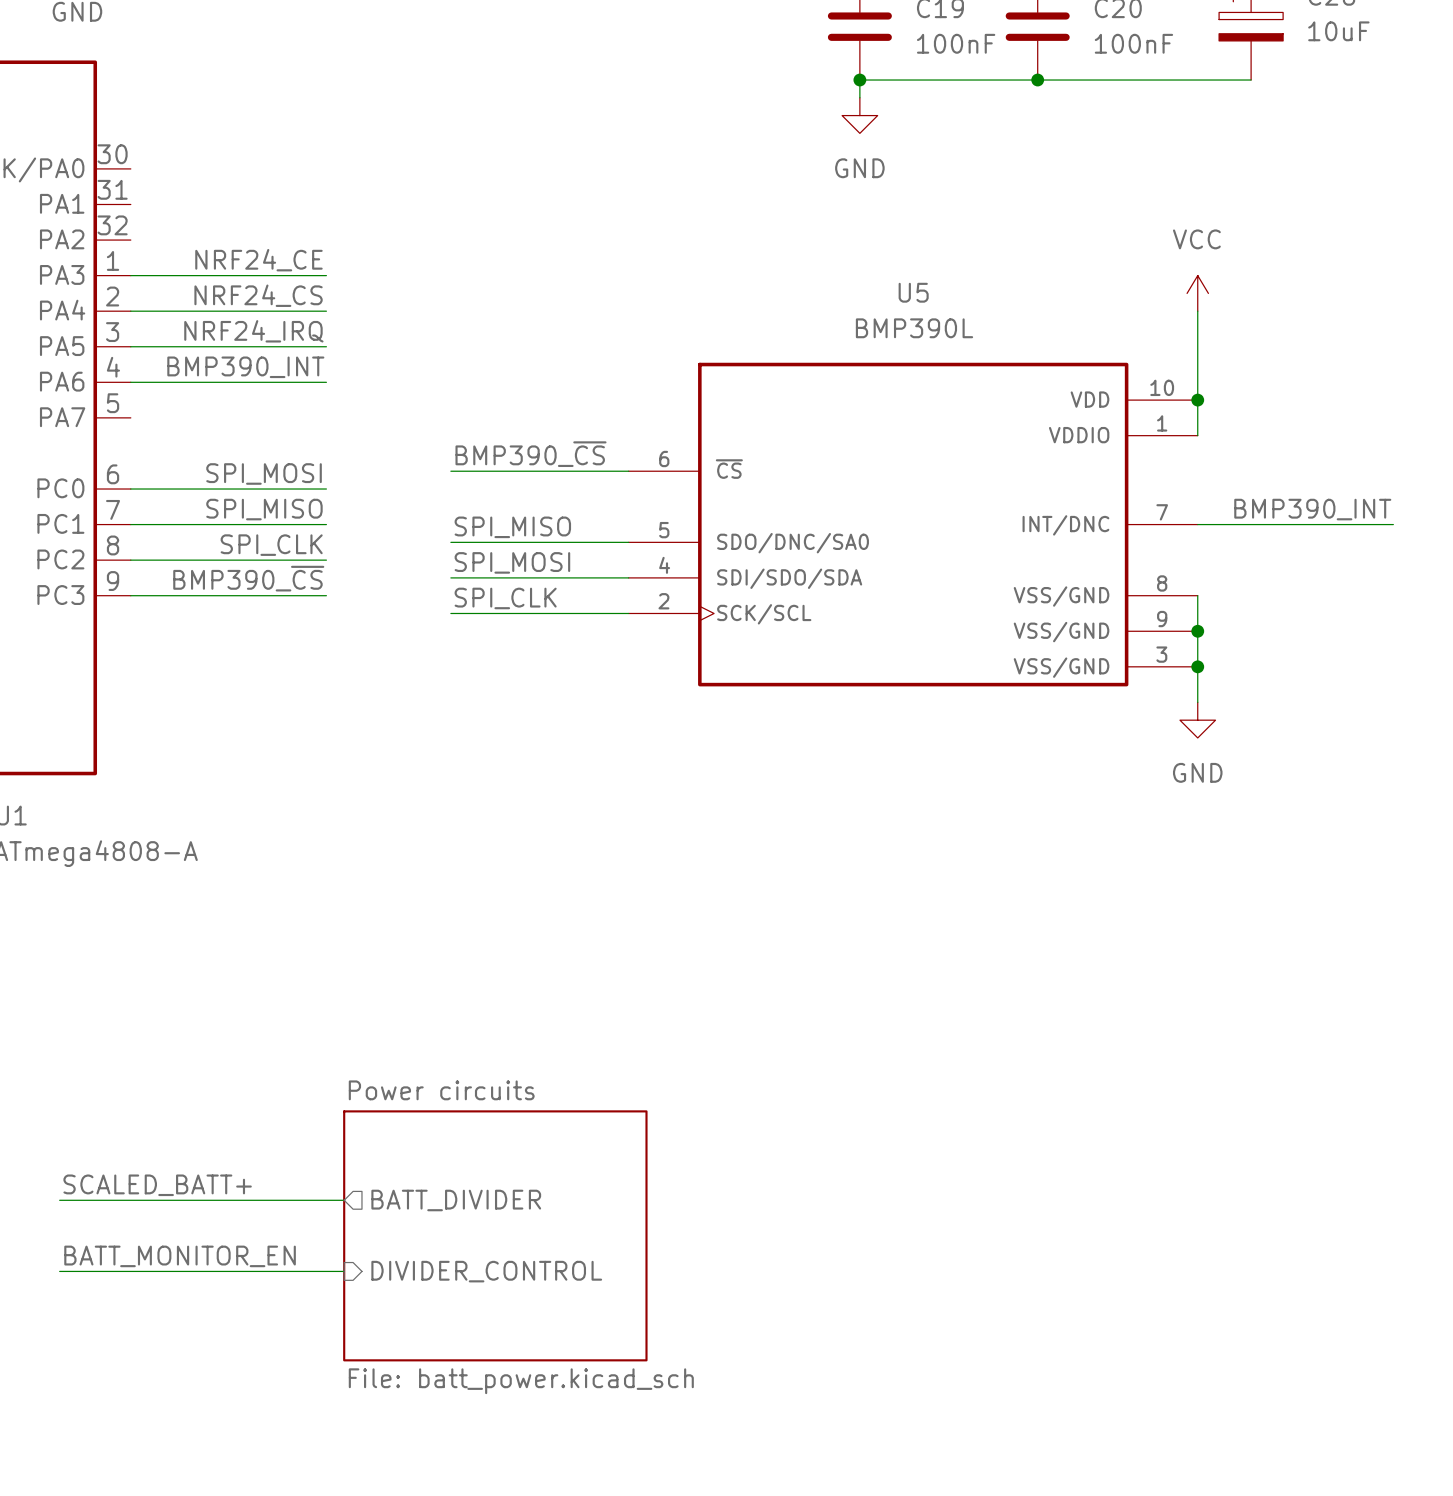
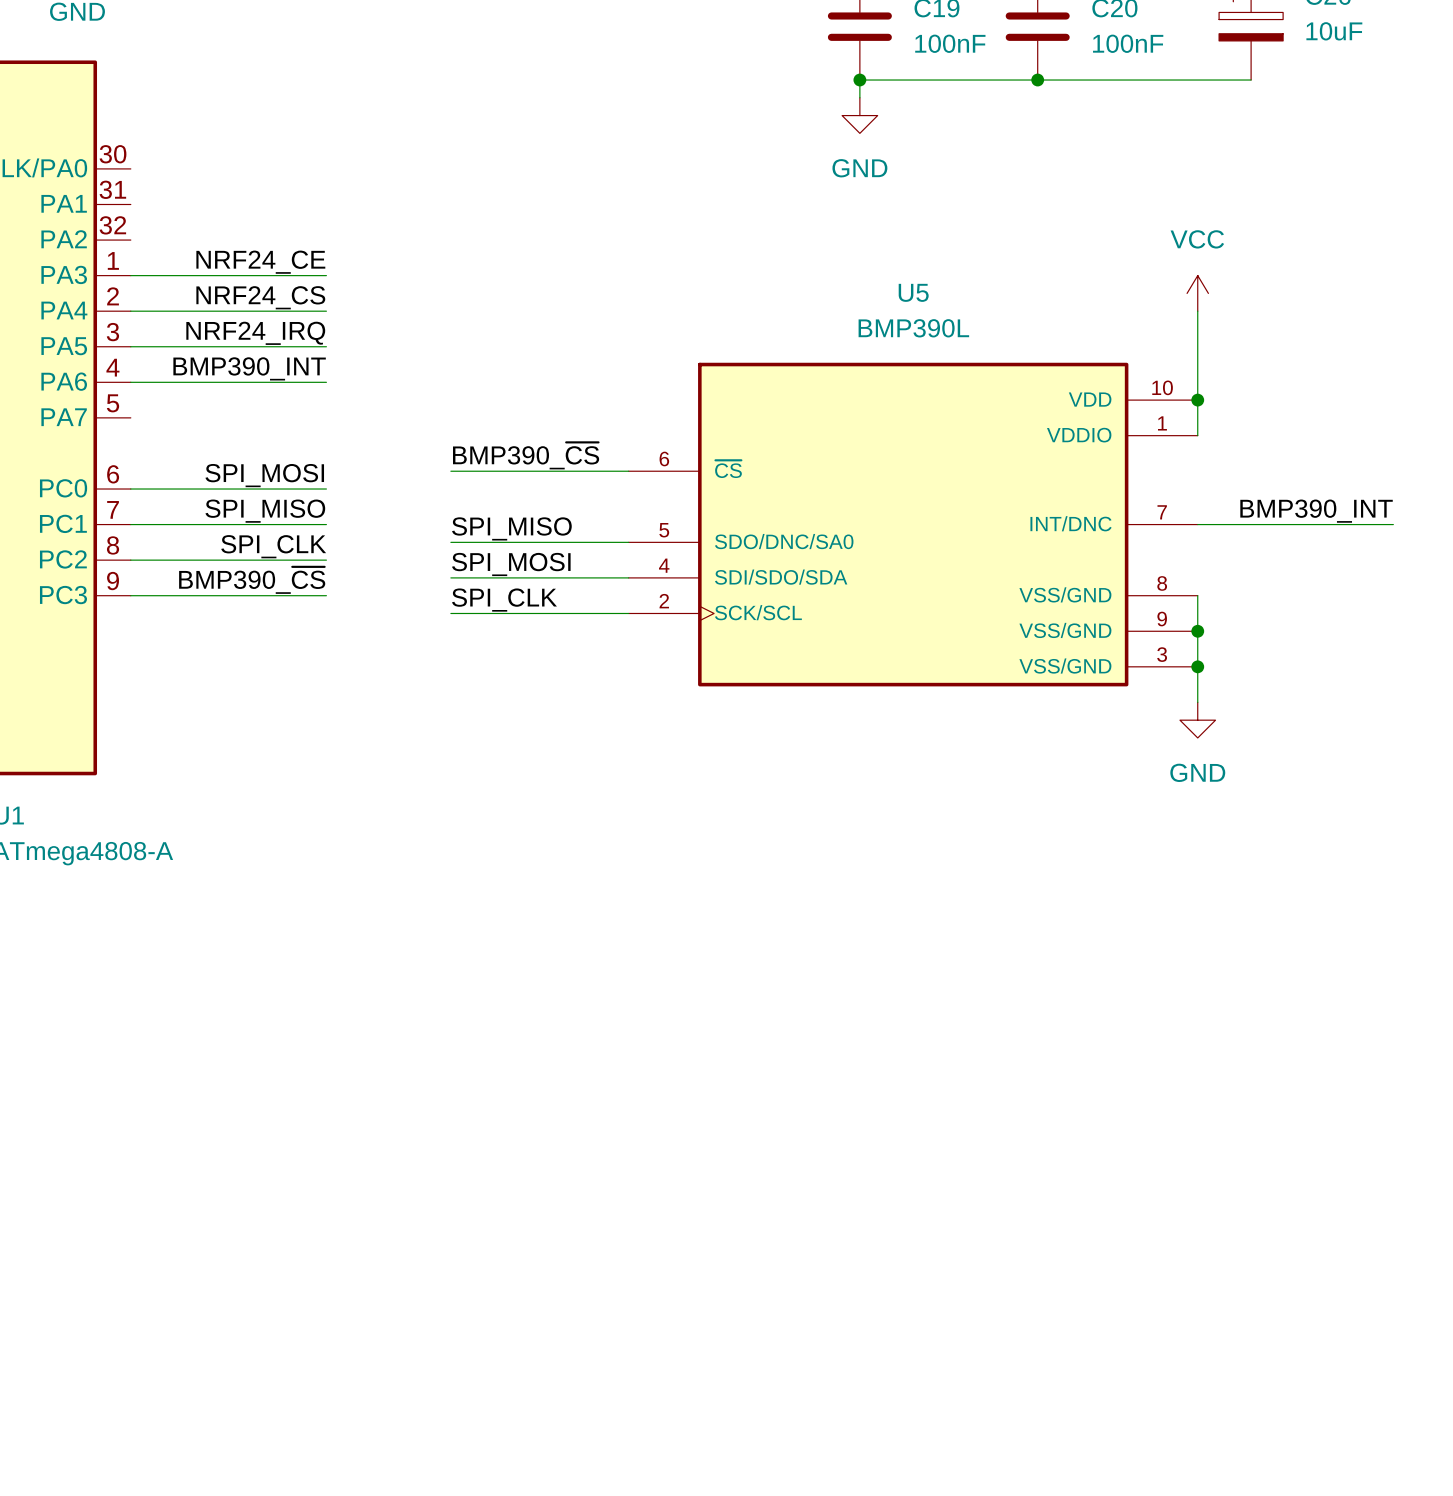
label: SCALED_BATT+ (157, 1185) -> none
wire: (59, 1200) (344, 1200) -> none
sheet pin: BATT_DIVIDER (456, 1200) -> none
sheet Power circuits: File: batt_power.kicad_sch (495, 1235) -> none
label: BATT_MONITOR_EN (180, 1256) -> none
wire: (59, 1271) (344, 1271) -> none
sheet pin: DIVIDER_CONTROL (486, 1271) -> none

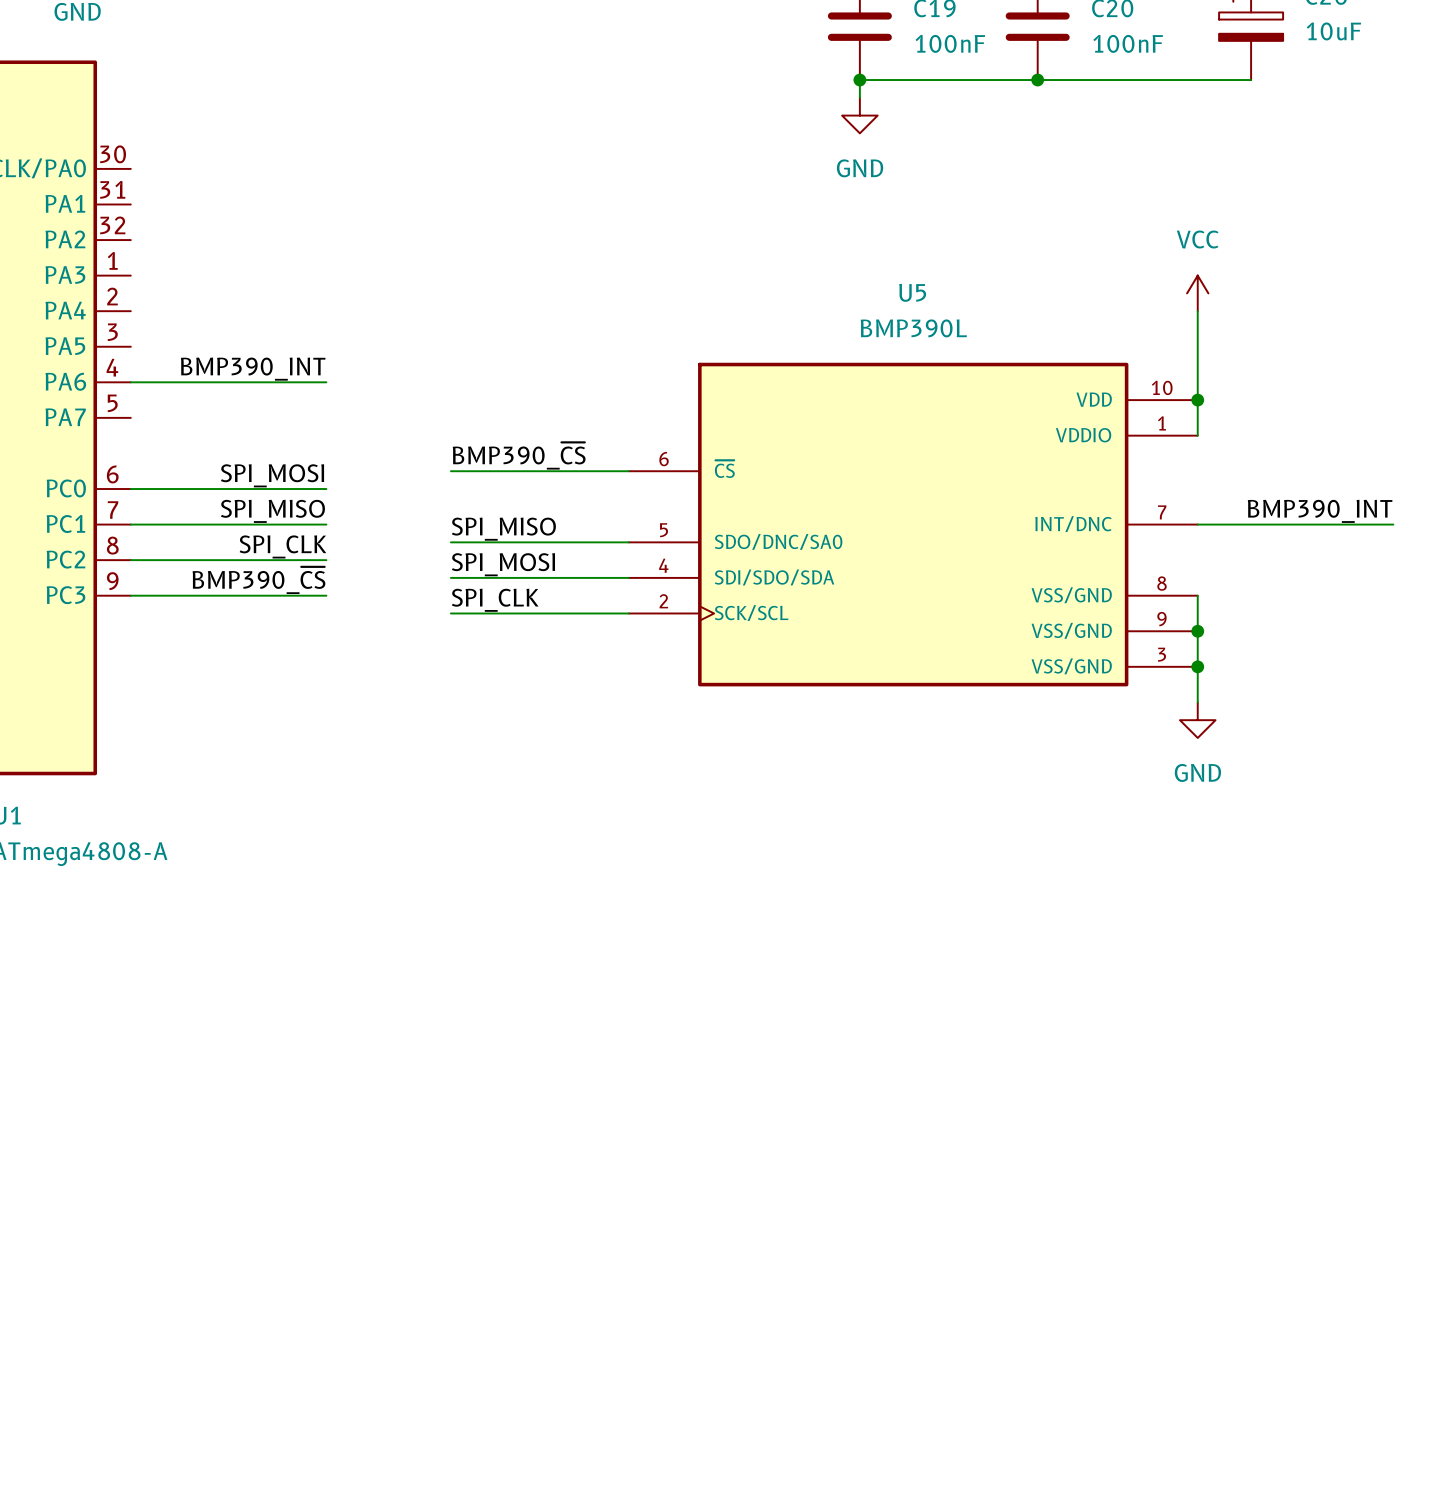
label: NRF24_CE (260, 262) -> none
wire: (130, 275) (326, 275) -> none
label: NRF24_CS (260, 297) -> none
wire: (130, 311) (326, 311) -> none
label: NRF24_IRQ (255, 333) -> none
wire: (130, 346) (326, 346) -> none

